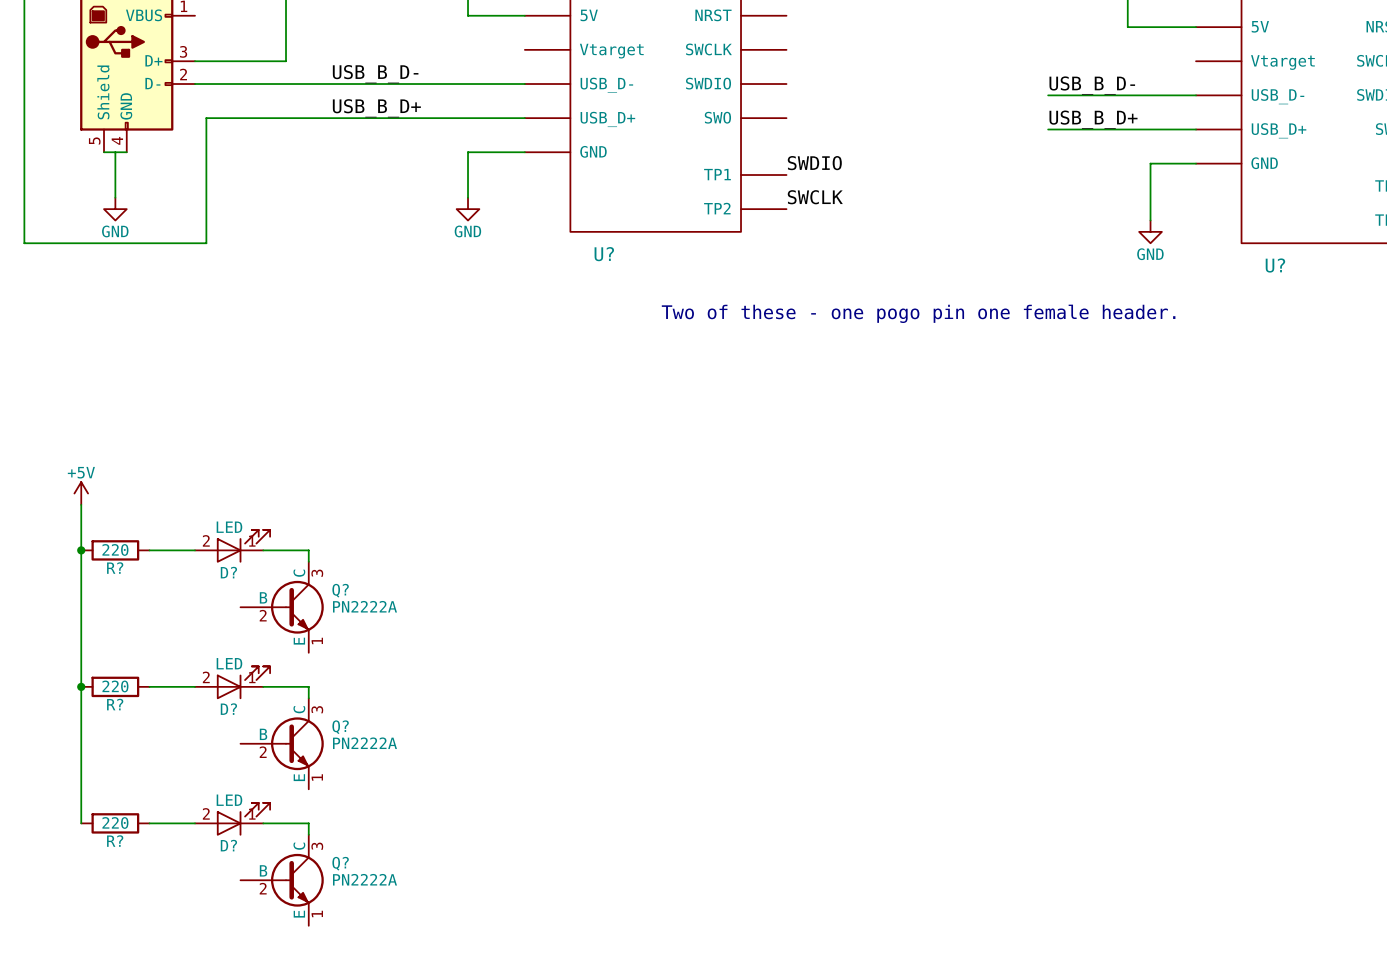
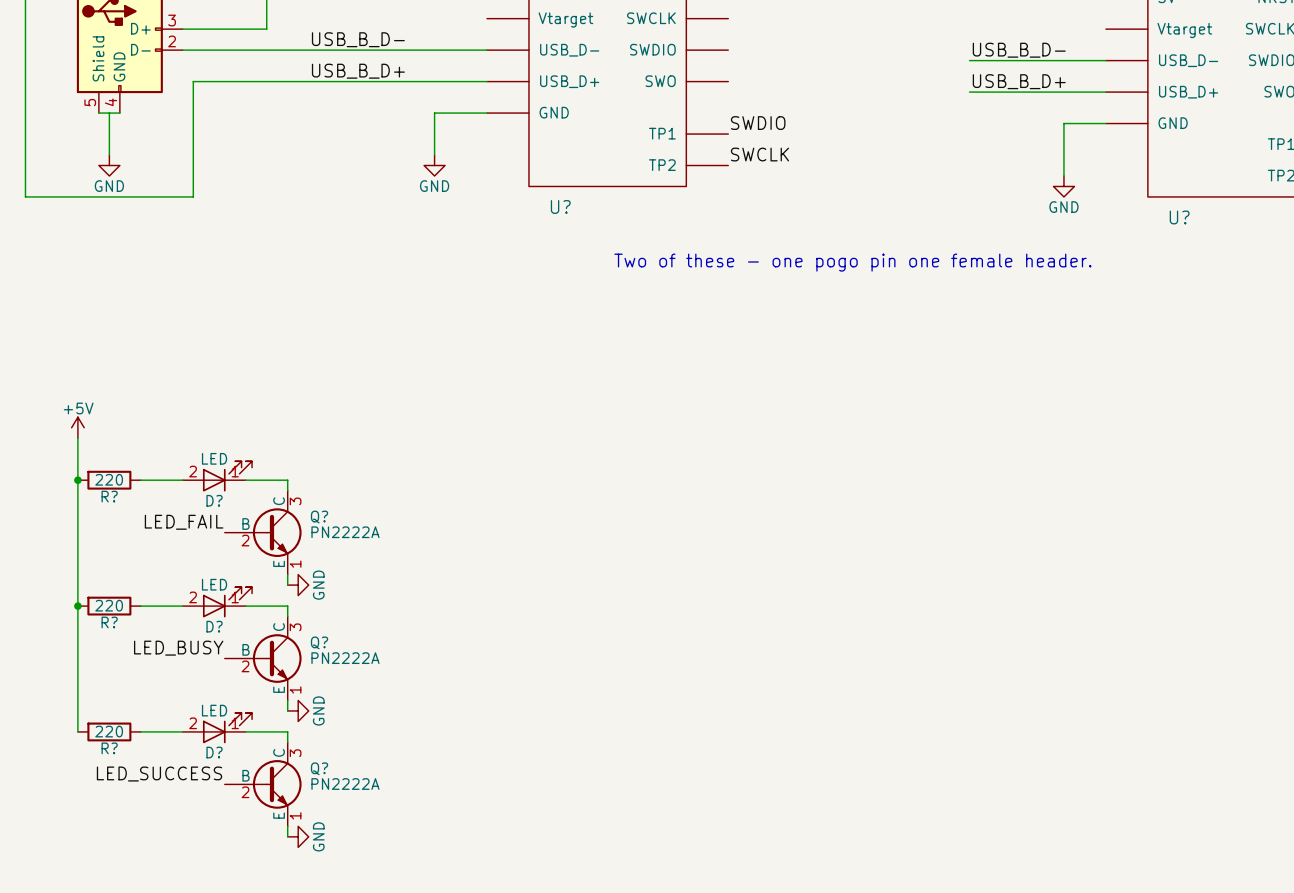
label: none -> LED_FAIL (184, 522)
wire: none -> (287, 574) (287, 585)
power symbol: none -> GND (298, 585)
label: none -> LED_BUSY (178, 648)
wire: none -> (287, 700) (287, 710)
power symbol: none -> GND (298, 710)
label: none -> LED_SUCCESS (159, 774)
wire: none -> (287, 826) (287, 836)
power symbol: none -> GND (298, 836)

